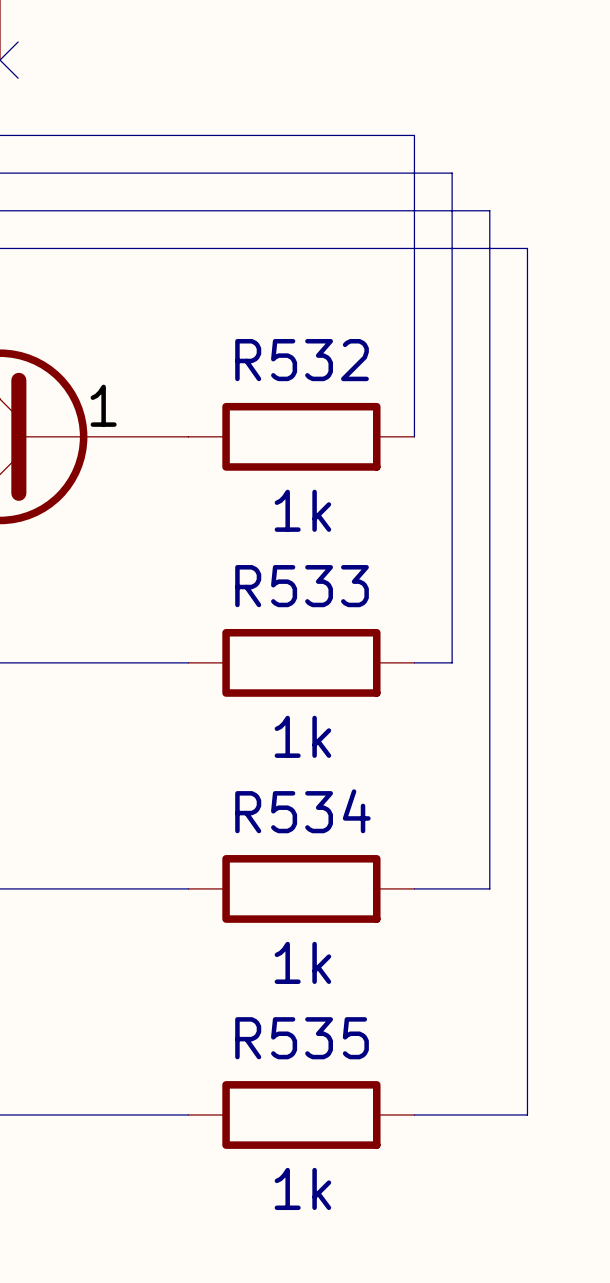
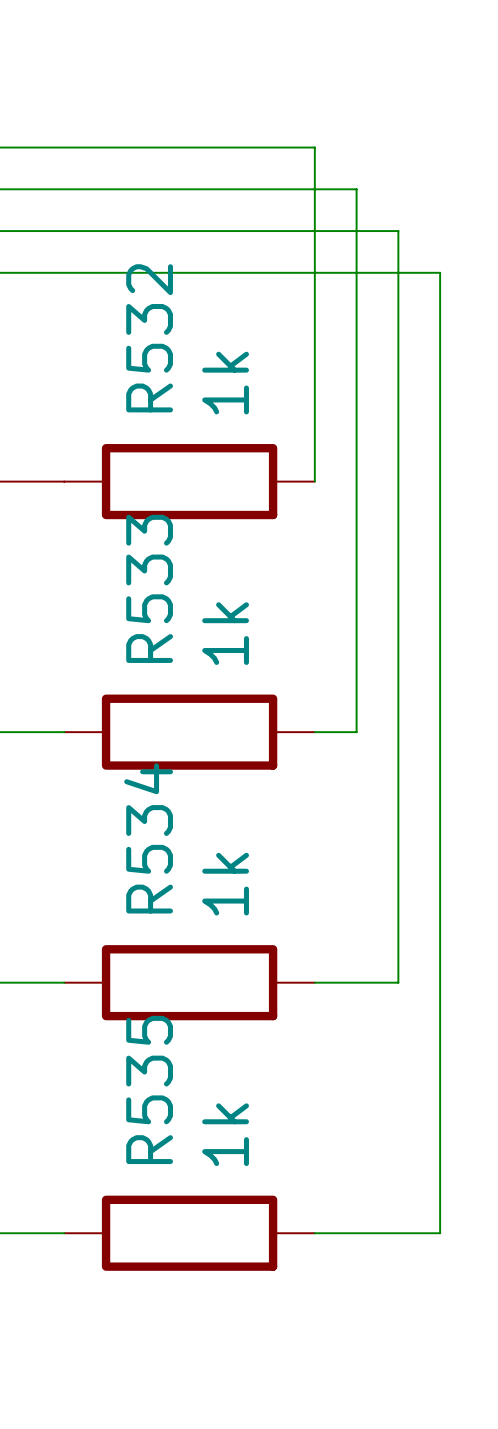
R532 name rotation: 0° (302, 360) -> 90° counterclockwise (149, 338)
R532 value rotation: 0° (302, 510) -> 90° counterclockwise (225, 383)
R532 value position: 1k (302, 510) -> 1k (225, 383)
R533 name rotation: 0° (302, 586) -> 90° counterclockwise (149, 588)
R533 value rotation: 0° (302, 736) -> 90° counterclockwise (225, 633)
R533 value position: 1k (302, 736) -> 1k (225, 633)
R534 name rotation: 0° (302, 811) -> 90° counterclockwise (148, 838)
R534 value rotation: 0° (302, 962) -> 90° counterclockwise (225, 884)
R534 value position: 1k (302, 962) -> 1k (225, 884)
R535 name rotation: 0° (302, 1038) -> 90° counterclockwise (149, 1089)
R535 value rotation: 0° (302, 1188) -> 90° counterclockwise (225, 1134)
R535 value position: 1k (302, 1188) -> 1k (225, 1134)

